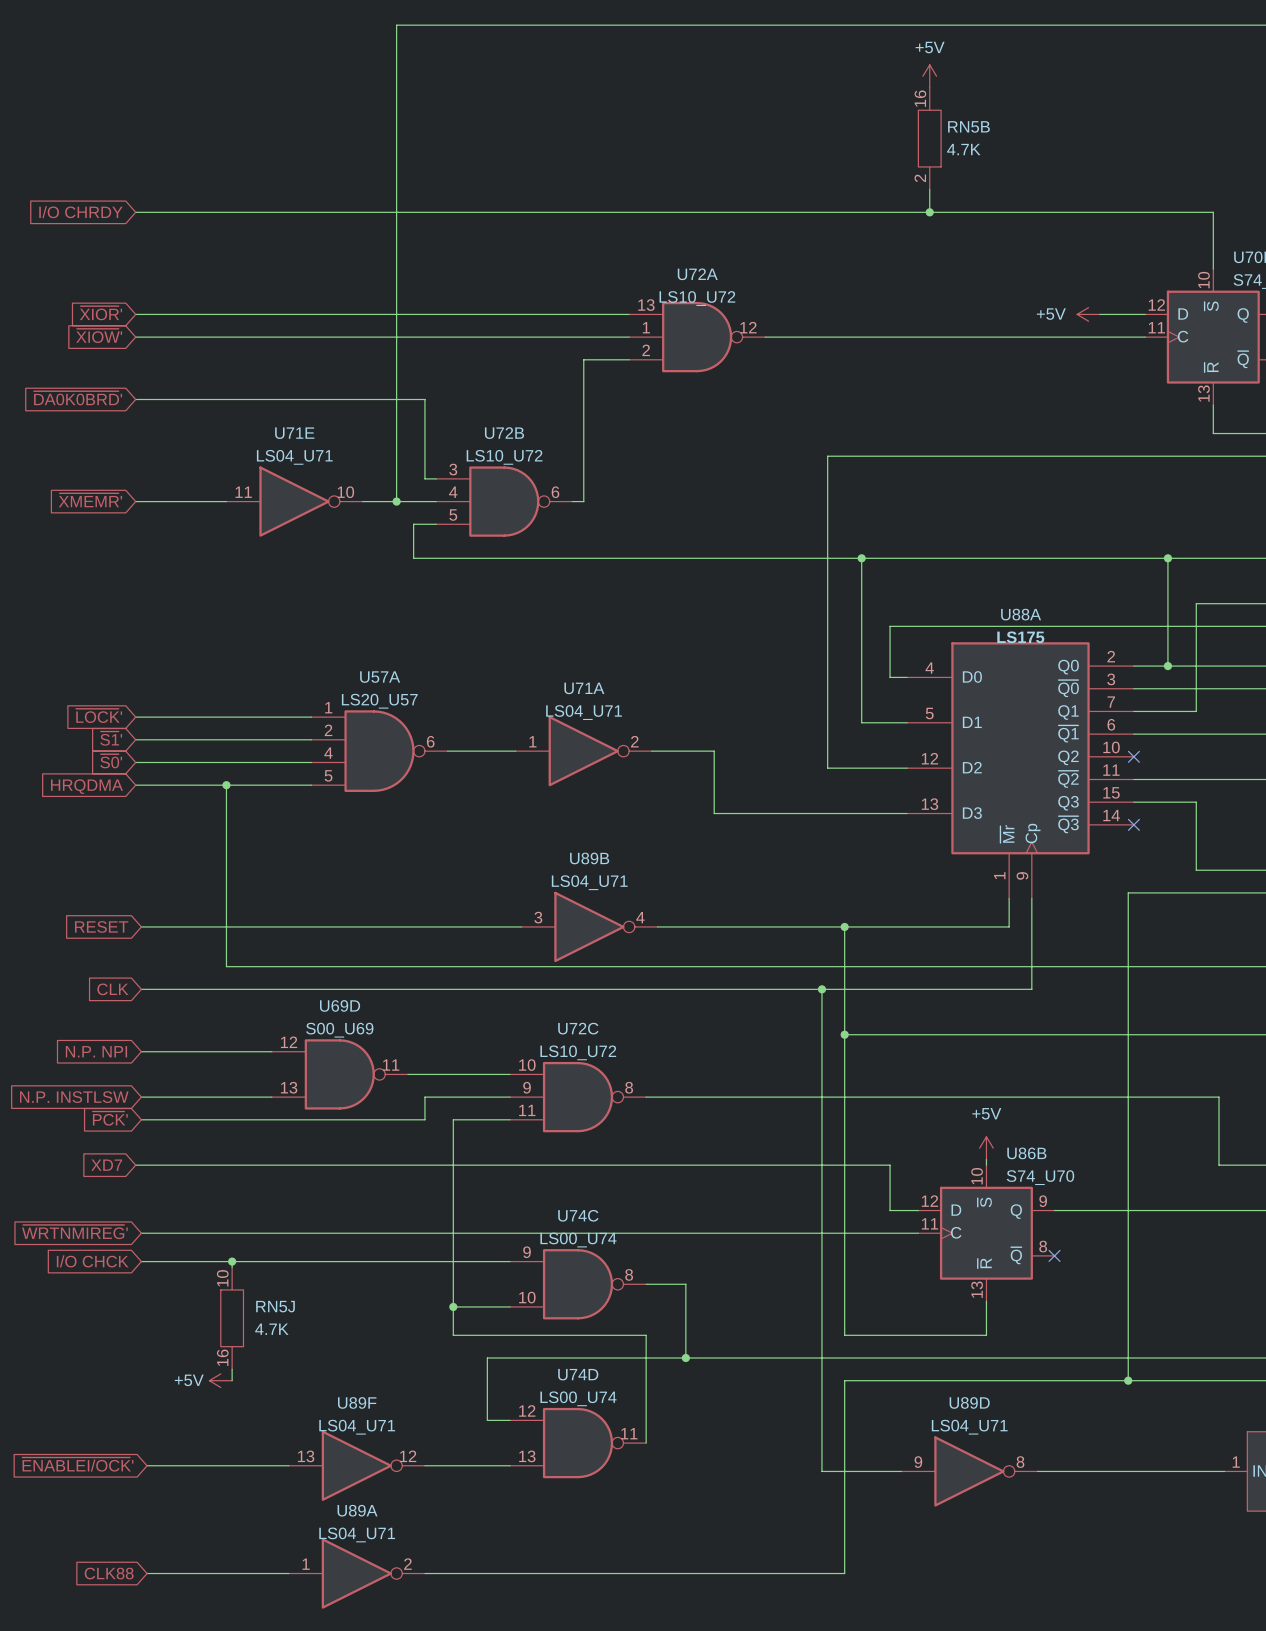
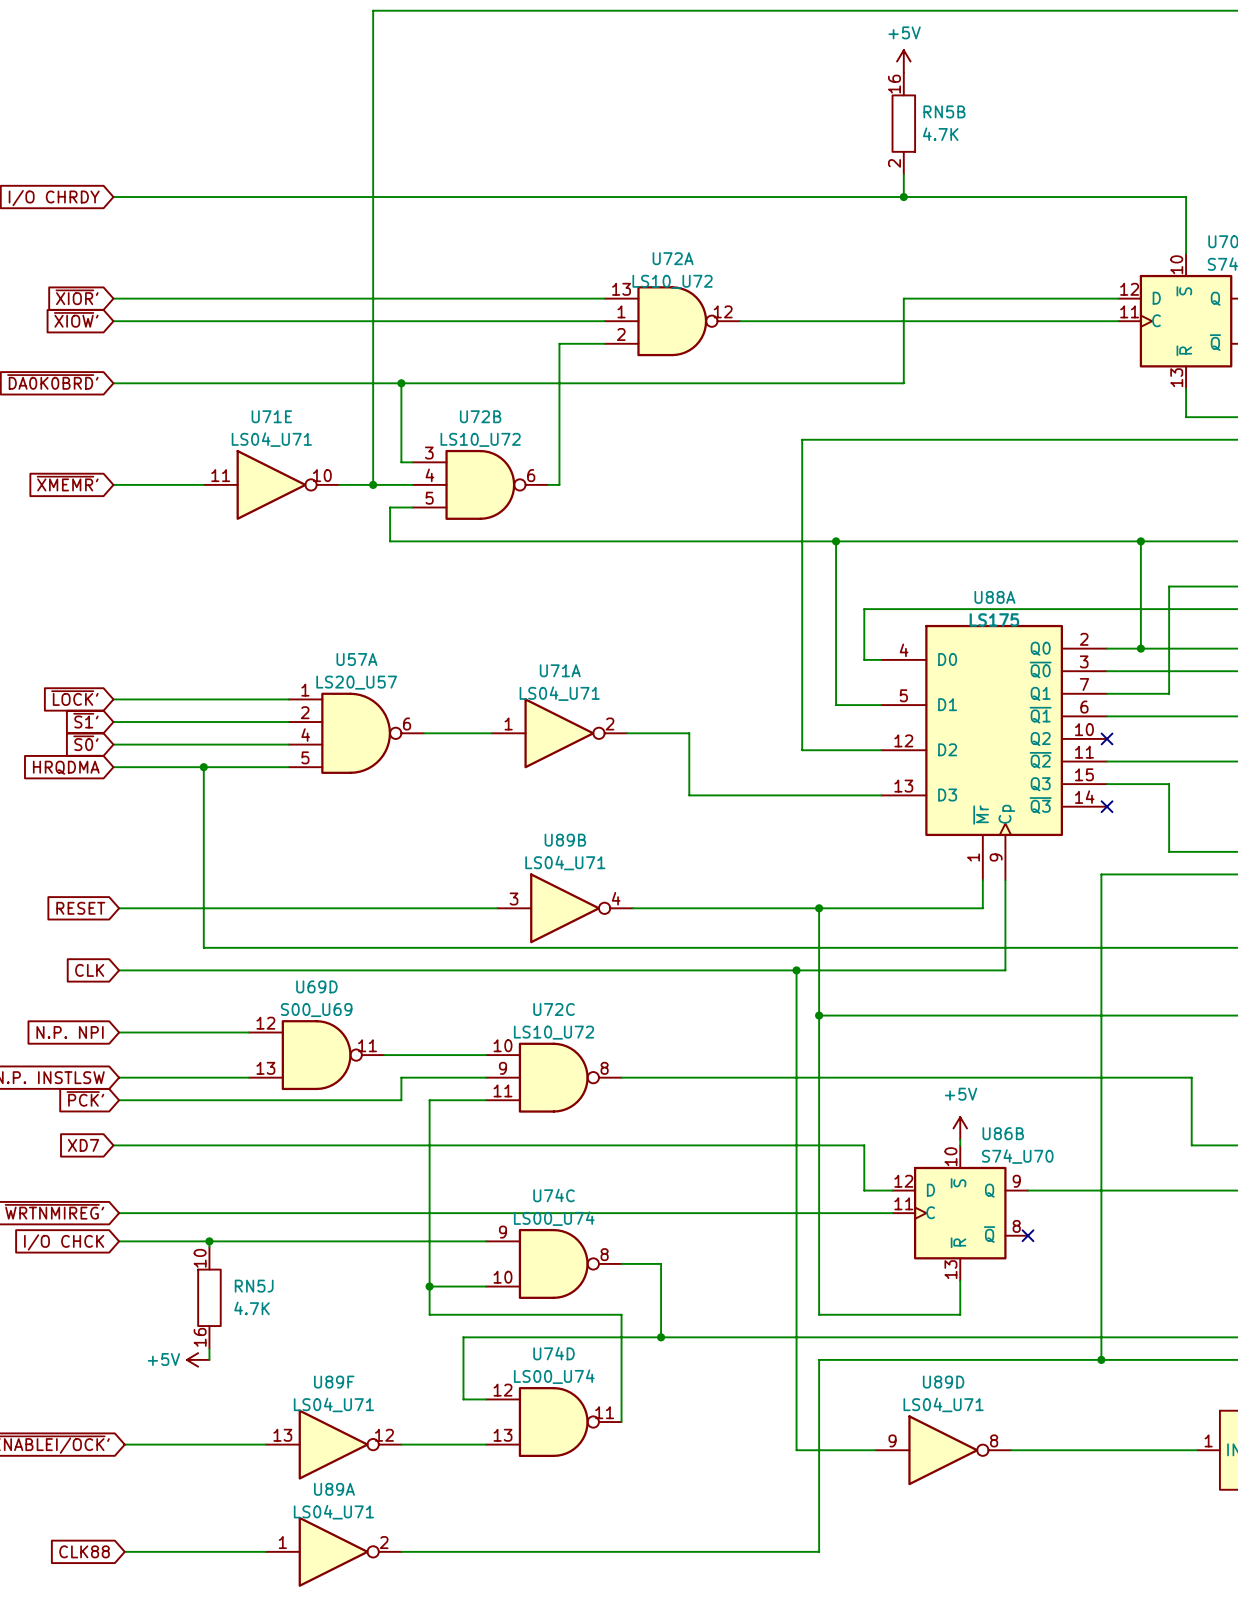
power symbol: +5V (1088, 314) -> none
wire: none -> (1073, 298) (903, 298) (903, 383) (401, 383)
junction: none -> (401, 383)

